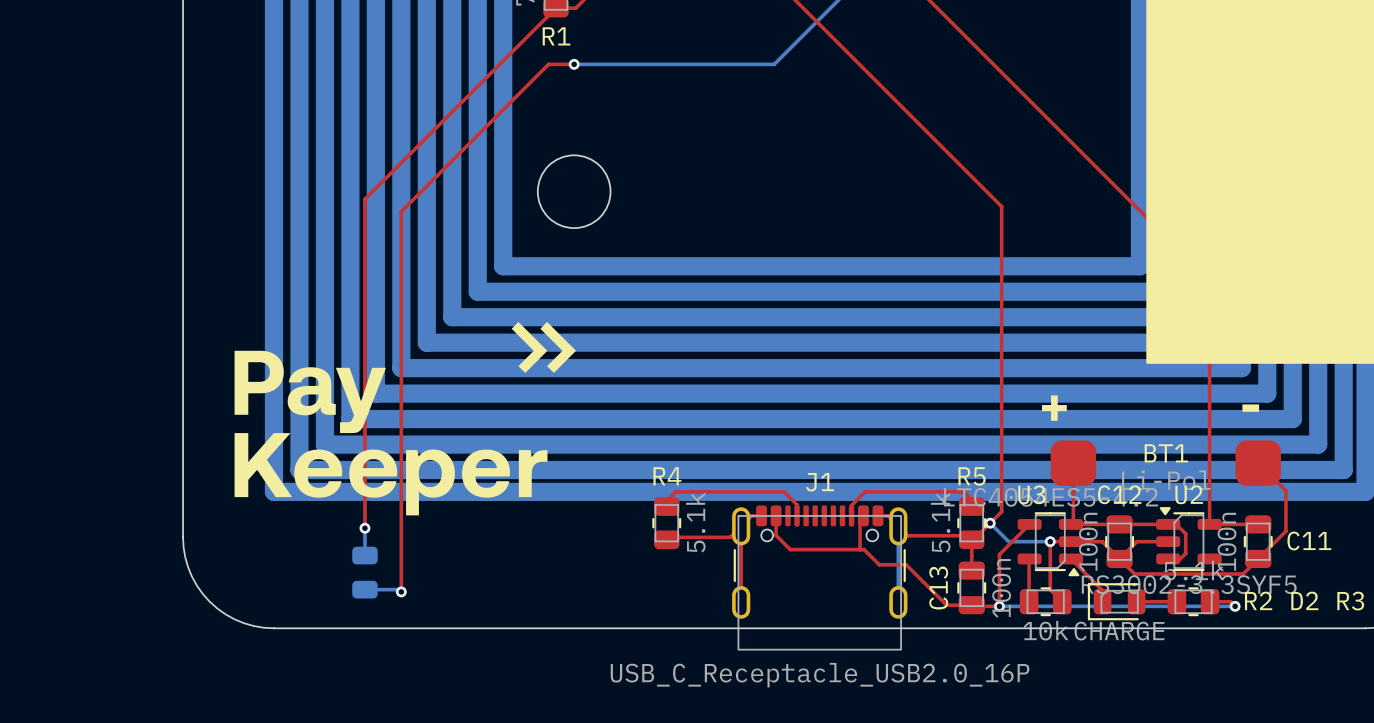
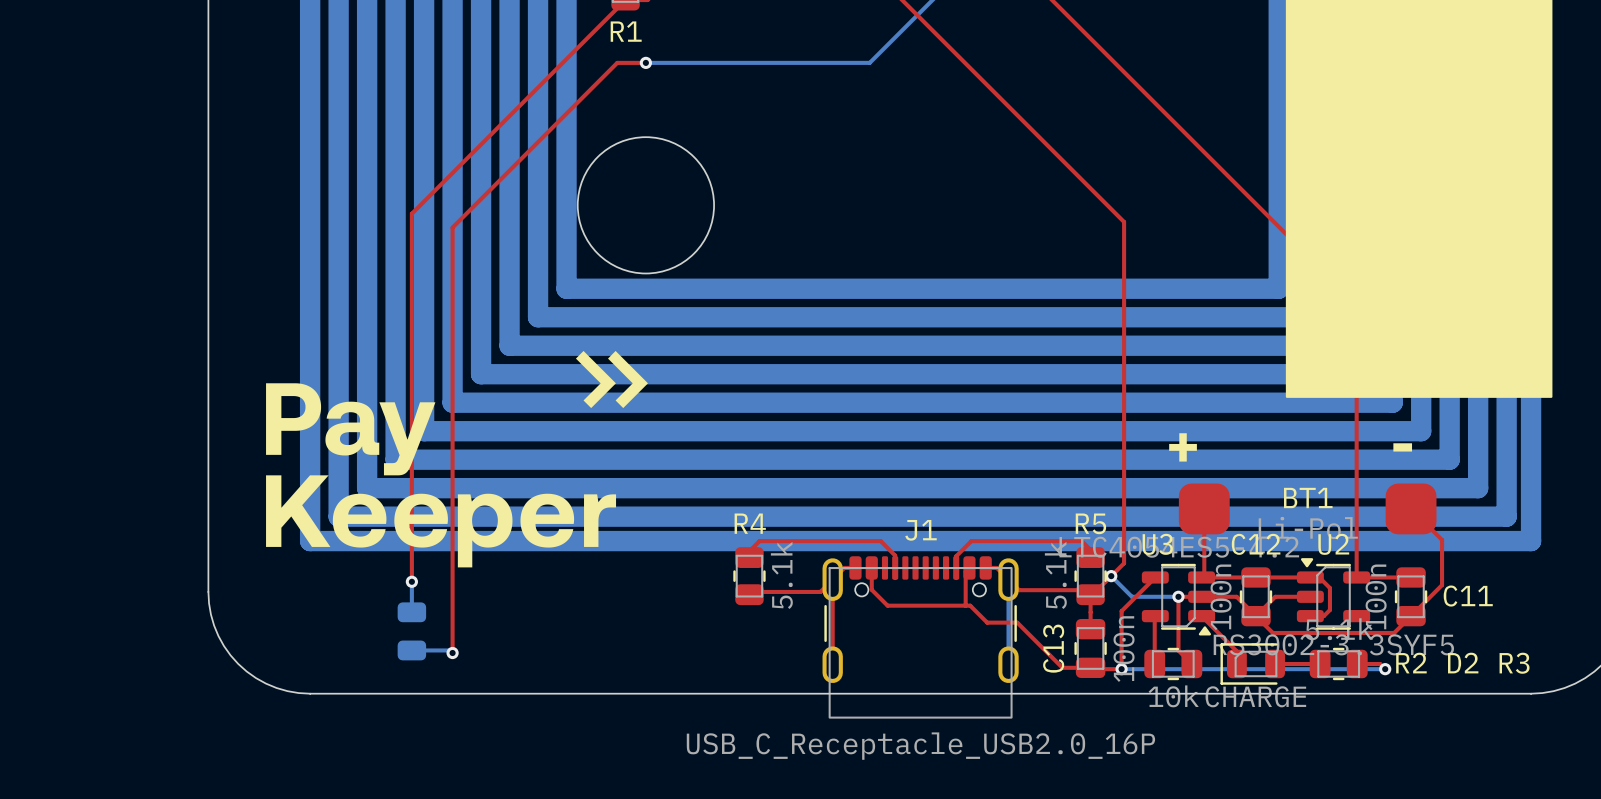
round board edge size: [537, 154, 612, 229] -> [577, 136, 715, 275]

